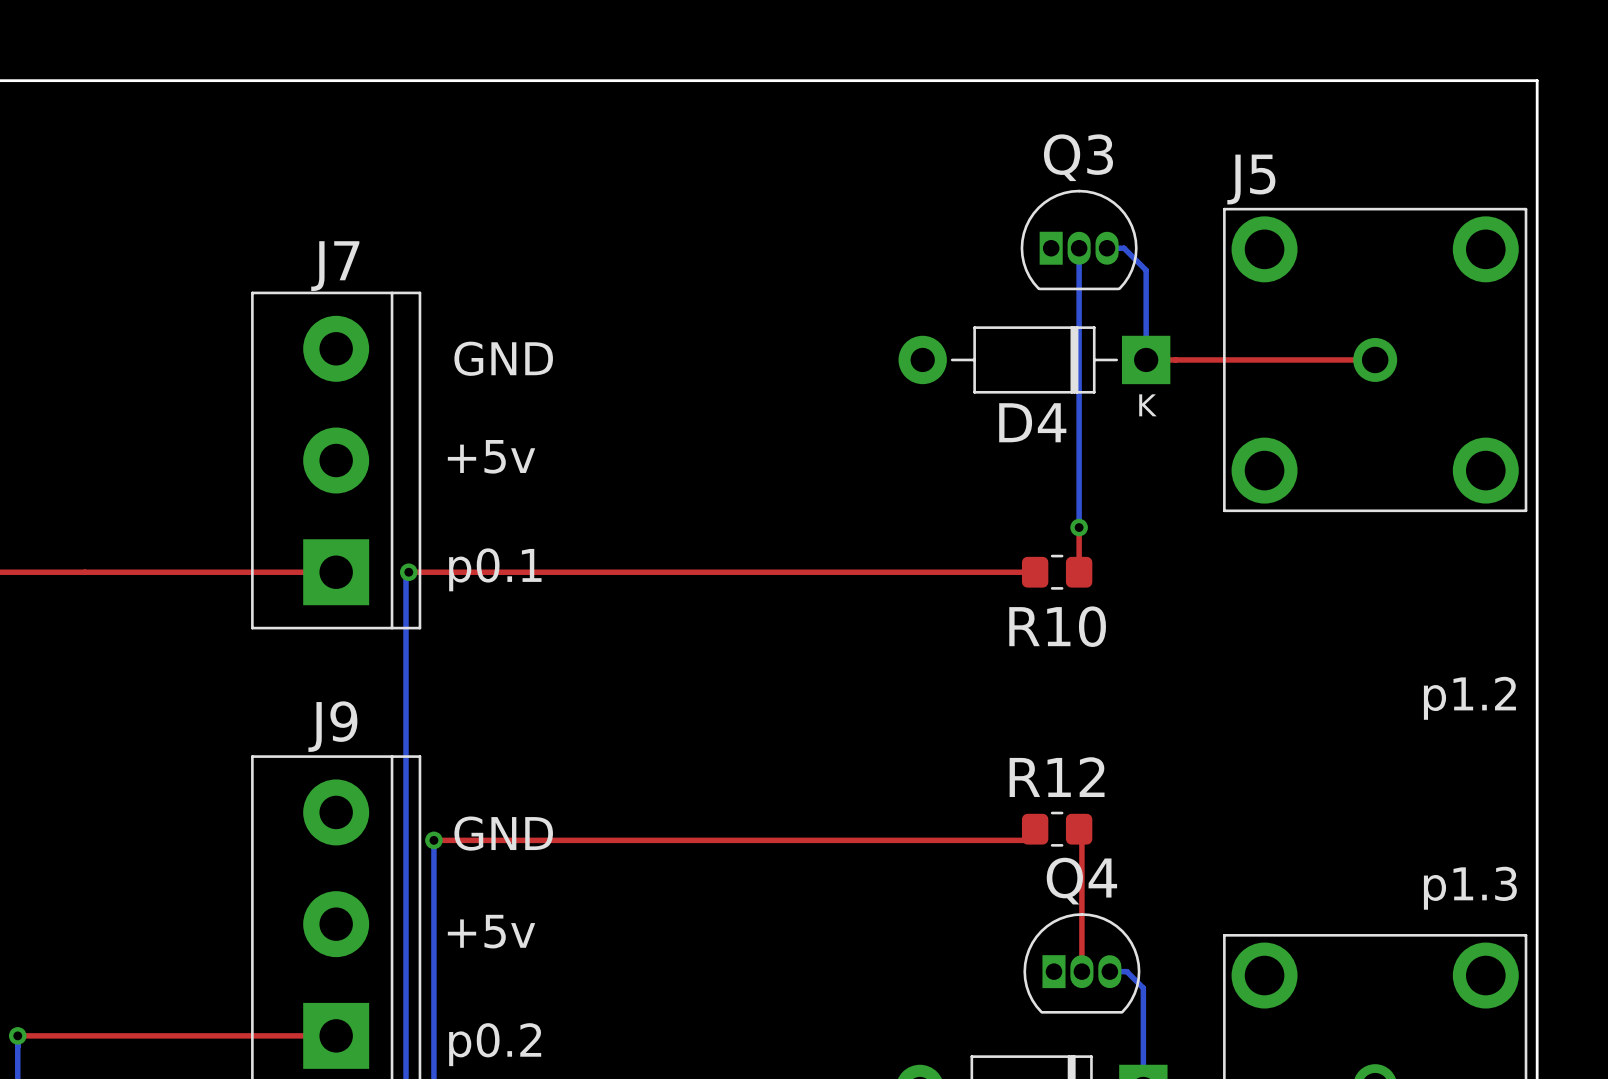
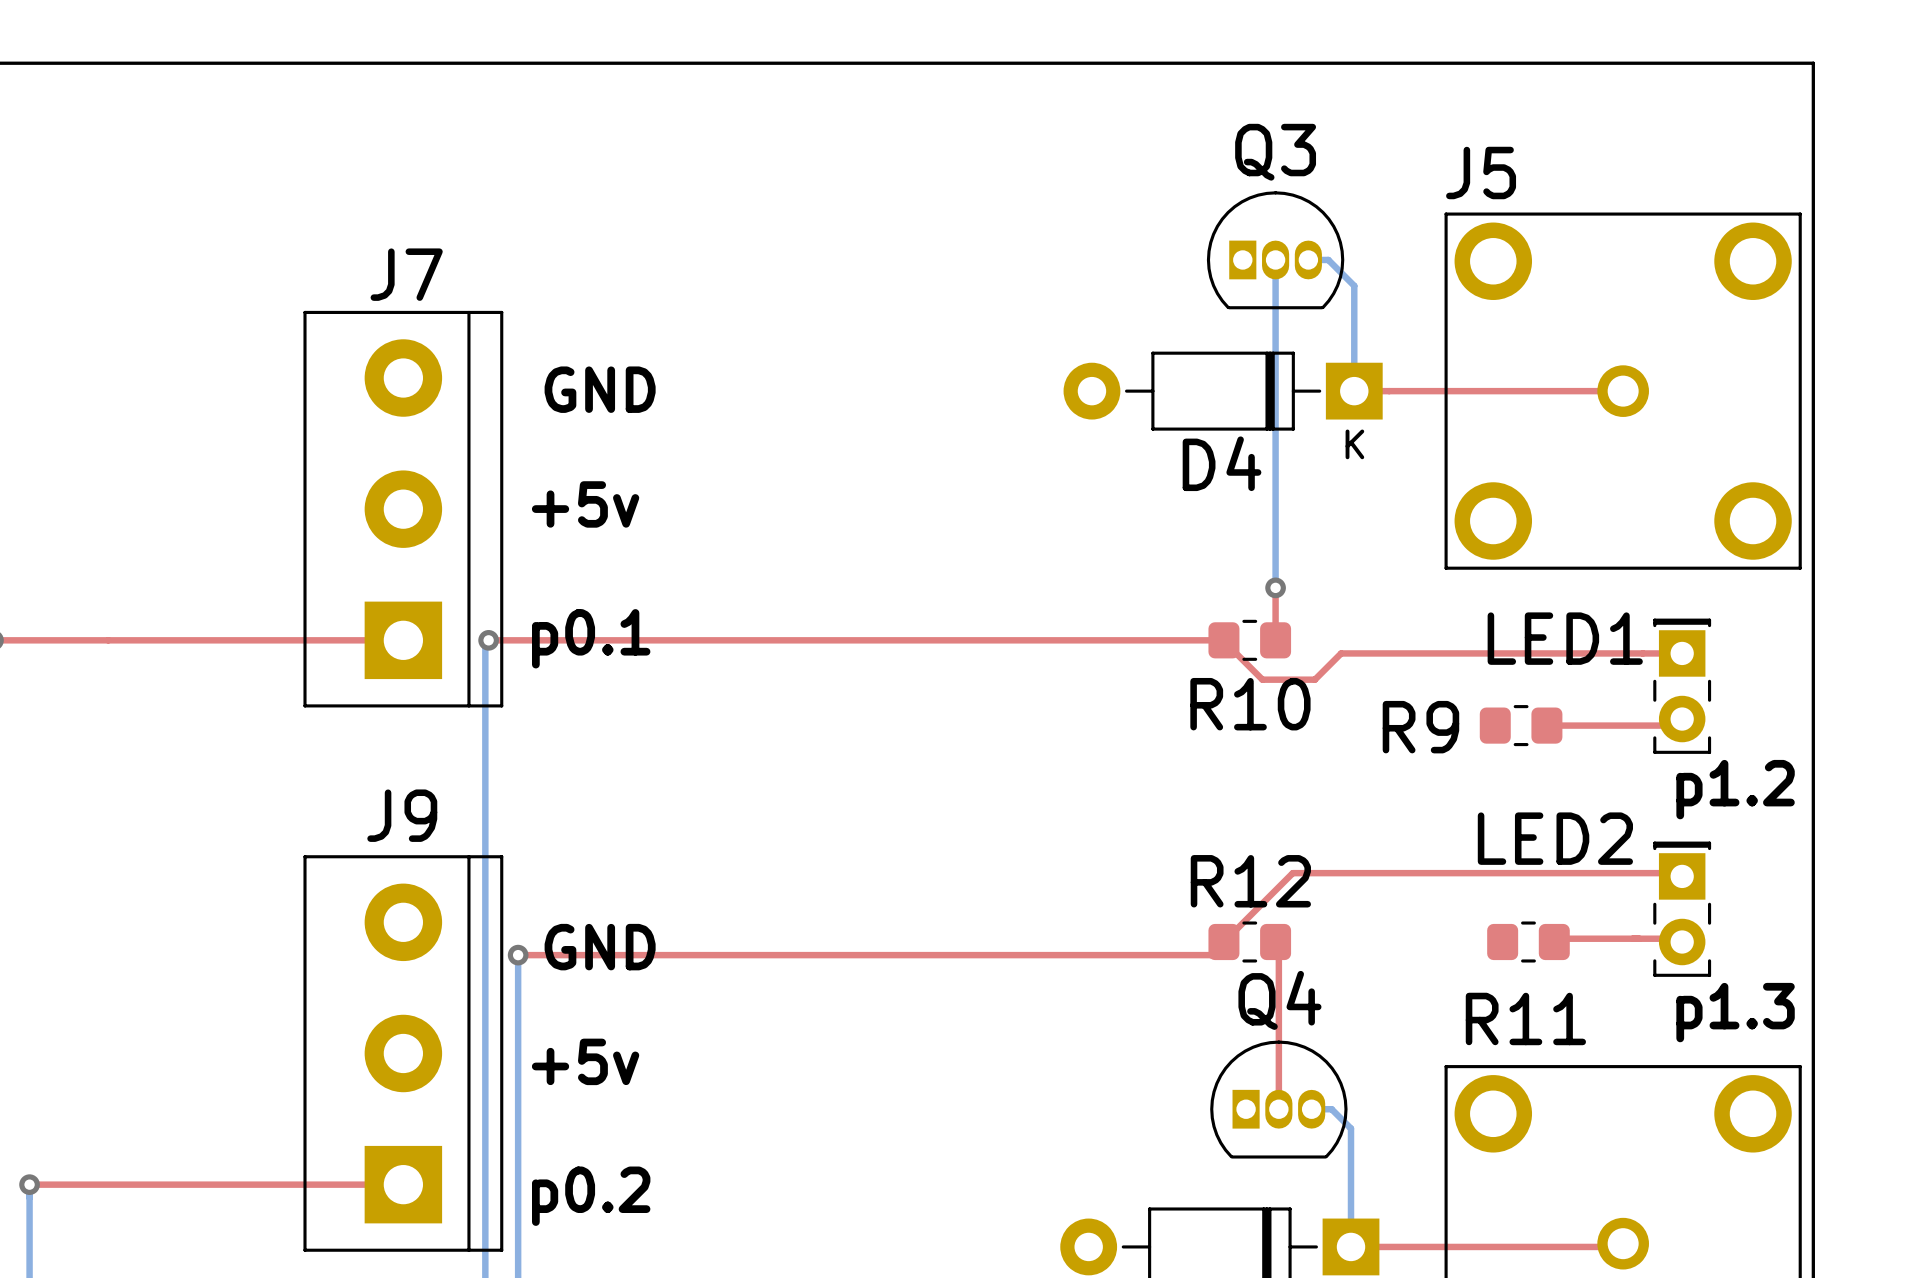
top track: none -> (1223, 641) (1262, 679) (1314, 679) (1341, 653) (1682, 653)
LED1: none -> (1682, 686)
top track: none -> (1682, 719) (1675, 725) (1546, 725)
R9: none -> (1521, 725)
top track: none -> (1682, 876) (1678, 873) (1292, 873) (1223, 942)
LED2: none -> (1682, 909)
R11: none -> (1528, 942)
top track: none -> (1554, 942) (1557, 938) (1678, 938) (1682, 942)

